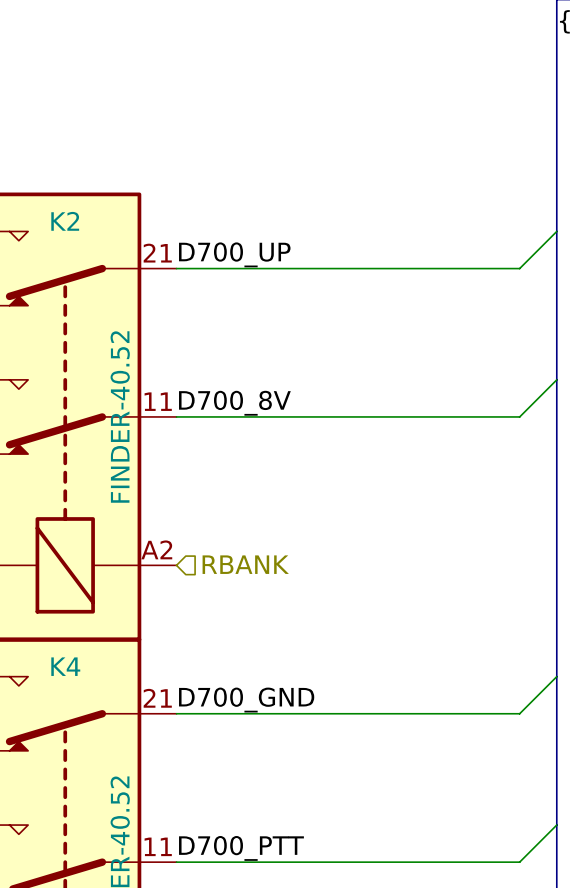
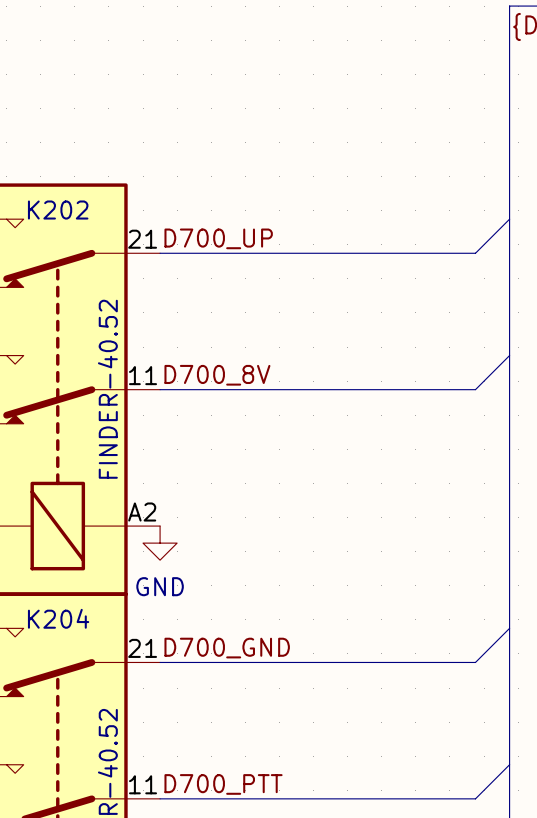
K2 name: K2 (65, 221) -> K202 (58, 210)
hierarchical label: RBANK (245, 564) -> none
power symbol: none -> GND (160, 543)
K4 name: K4 (65, 666) -> K204 (58, 618)

